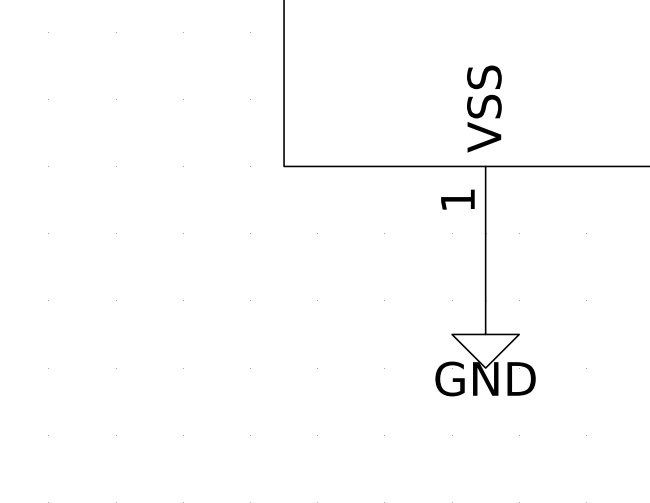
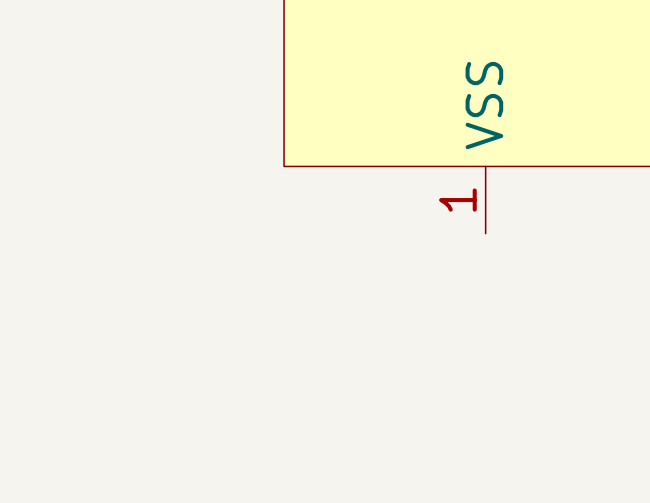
wire: (485, 233) (485, 300) -> none
power symbol: GND (485, 334) -> none

